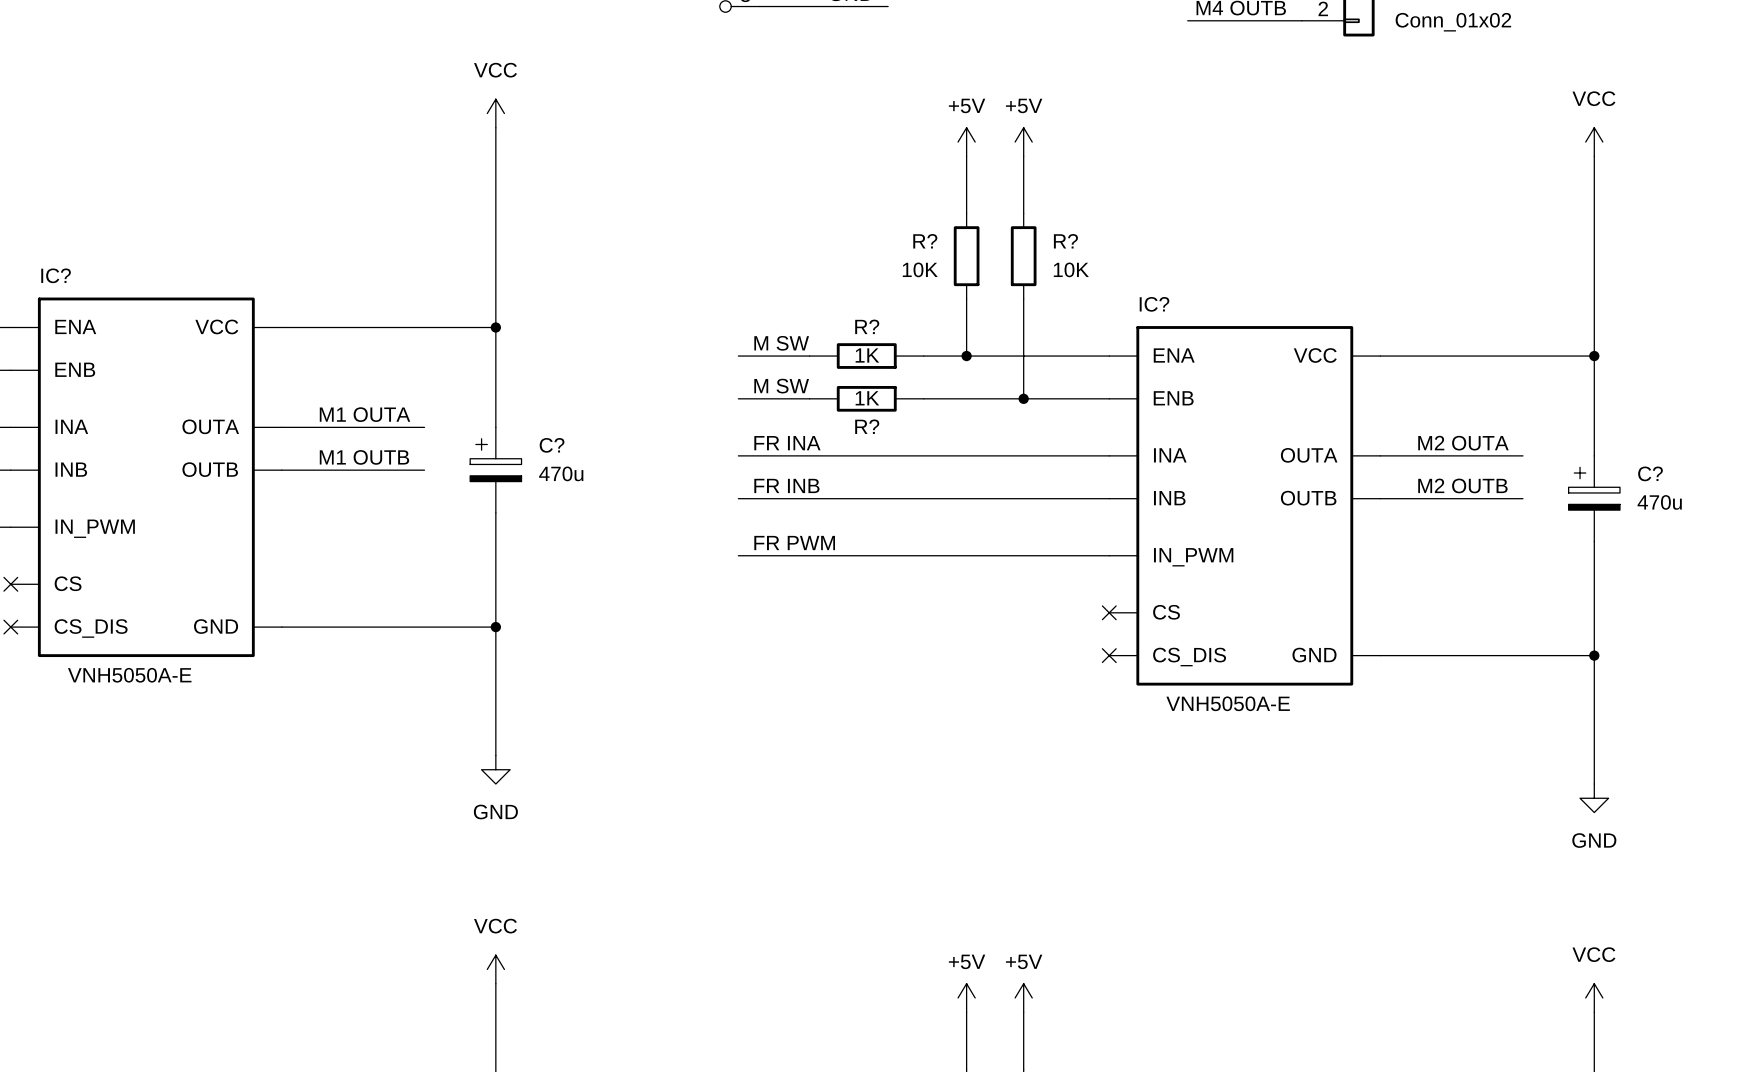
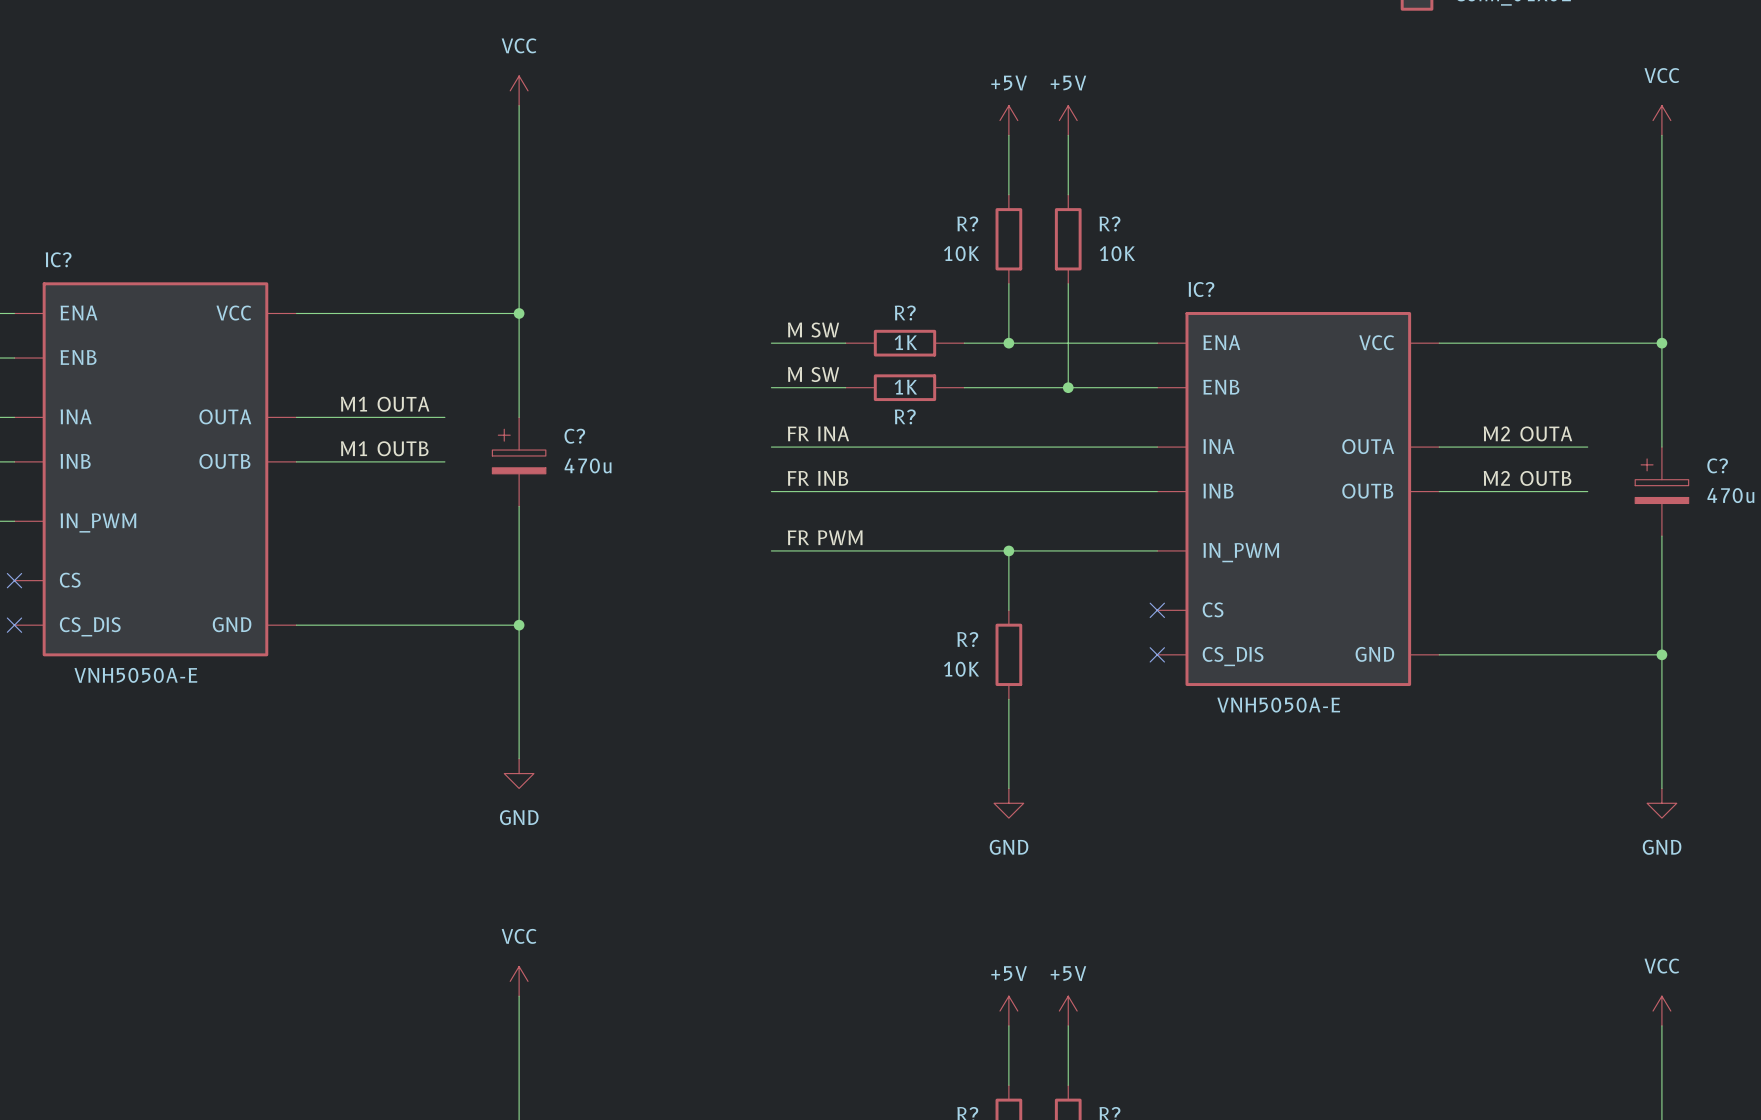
wire: none -> (1008, 550) (1008, 610)
junction: none -> (1008, 550)
R?: none -> 10K (1008, 654)
wire: none -> (1008, 699) (1008, 788)
power symbol: none -> GND (1008, 803)

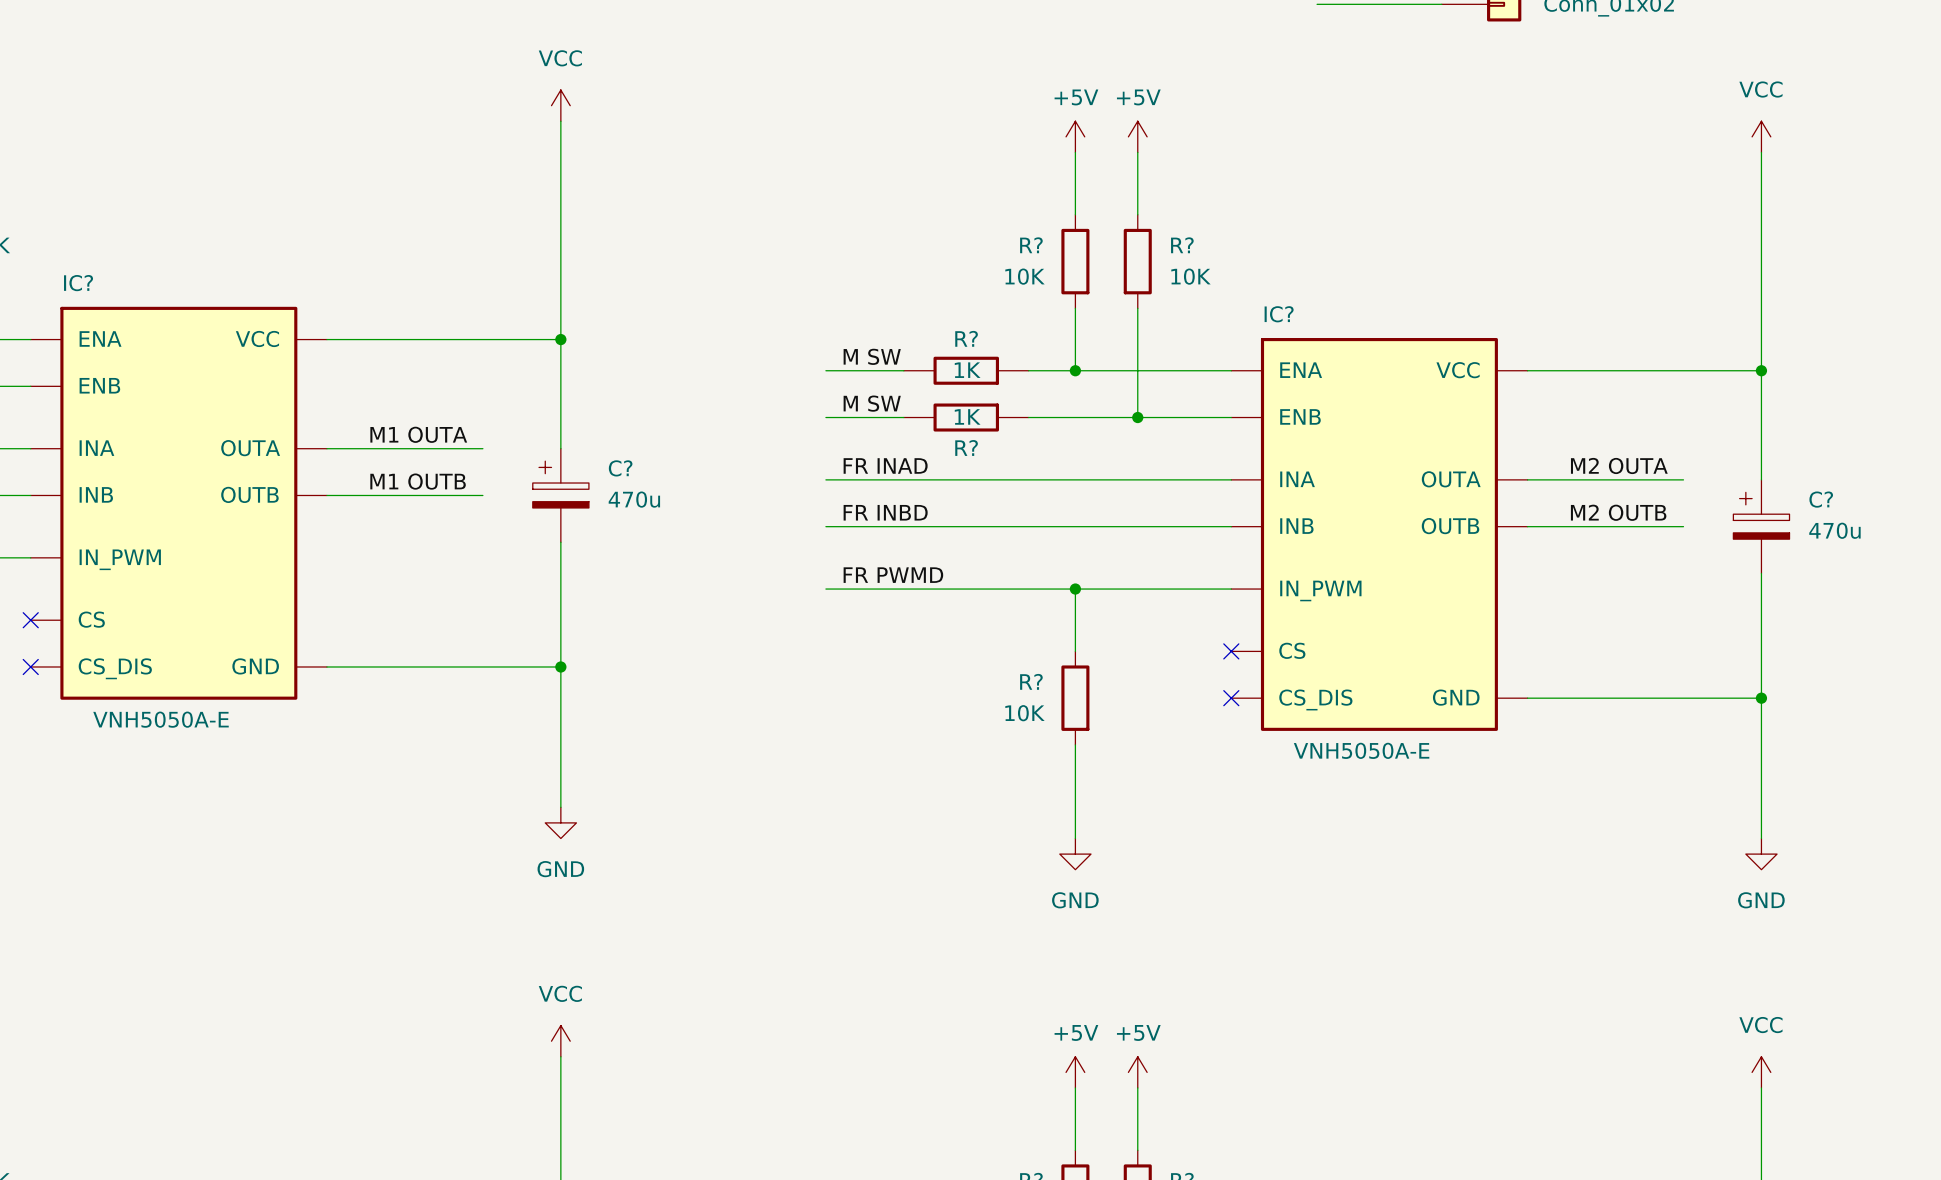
label: FR INA (818, 433) -> FR INAD (885, 465)
label: FR INB (818, 478) -> FR INBD (885, 512)
label: FR PWM (825, 537) -> FR PWMD (893, 575)

